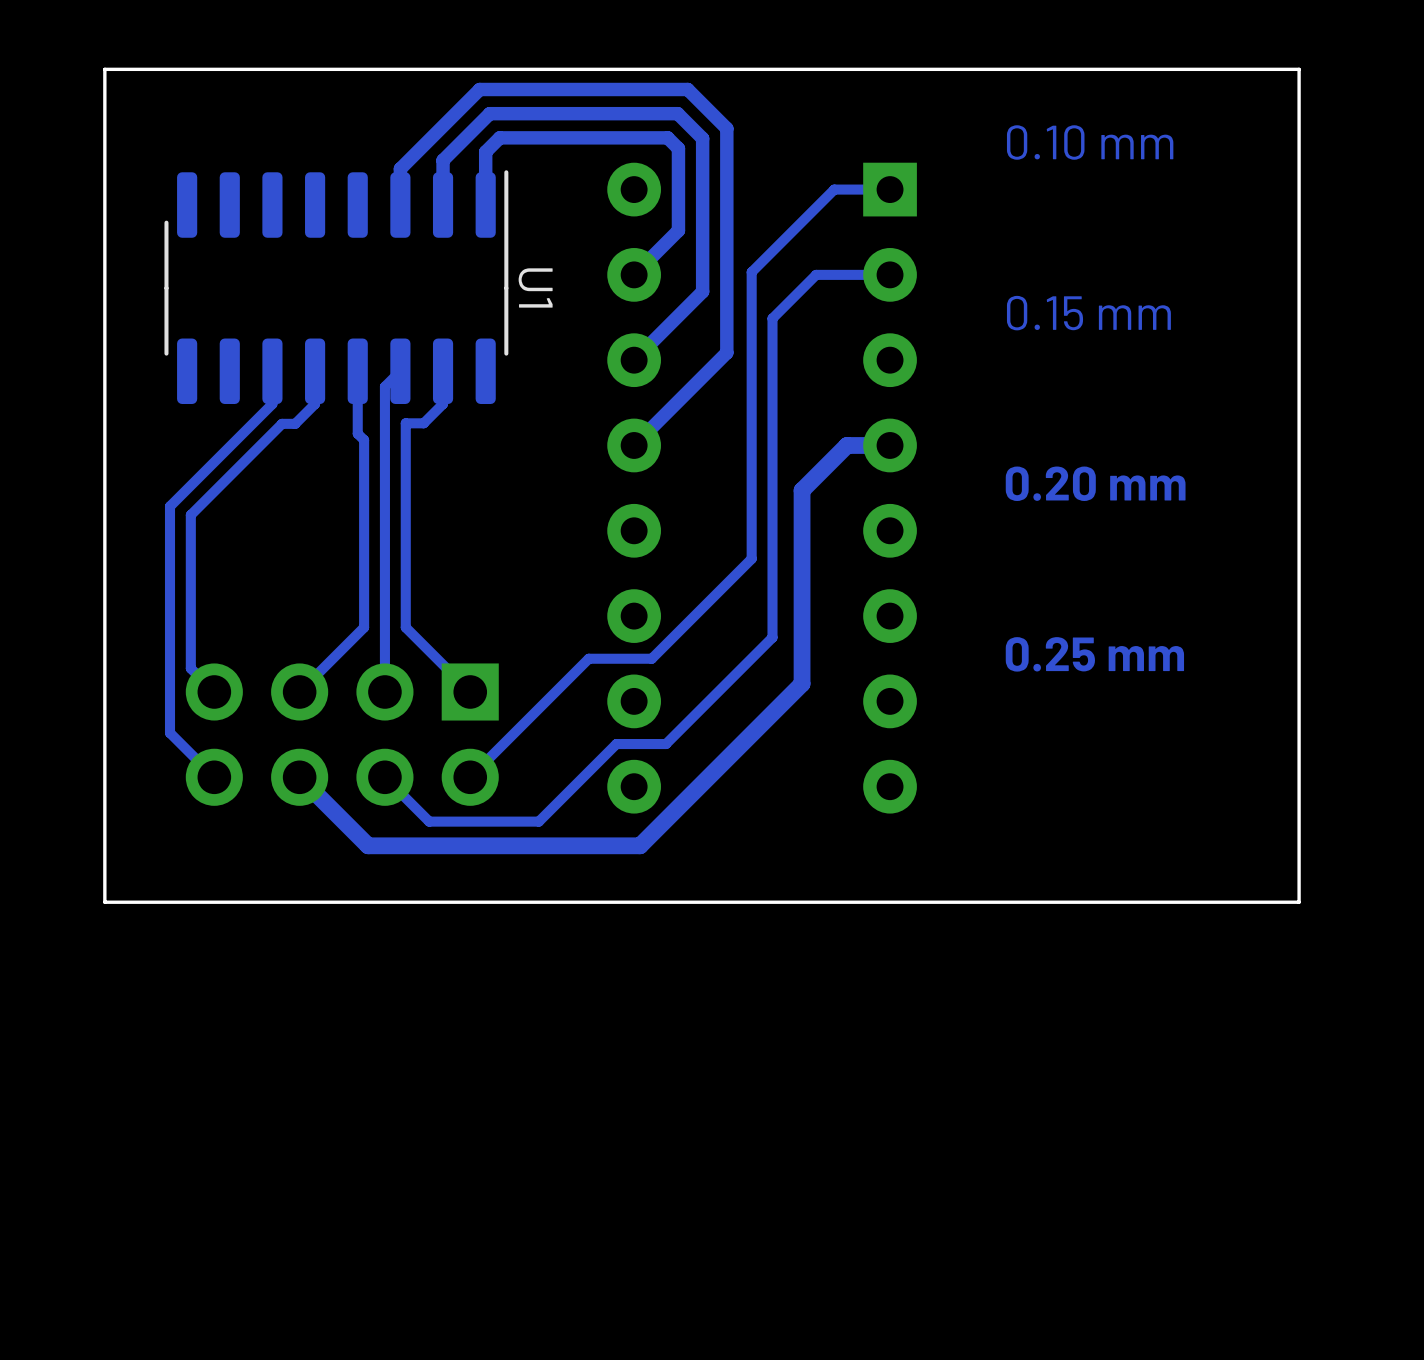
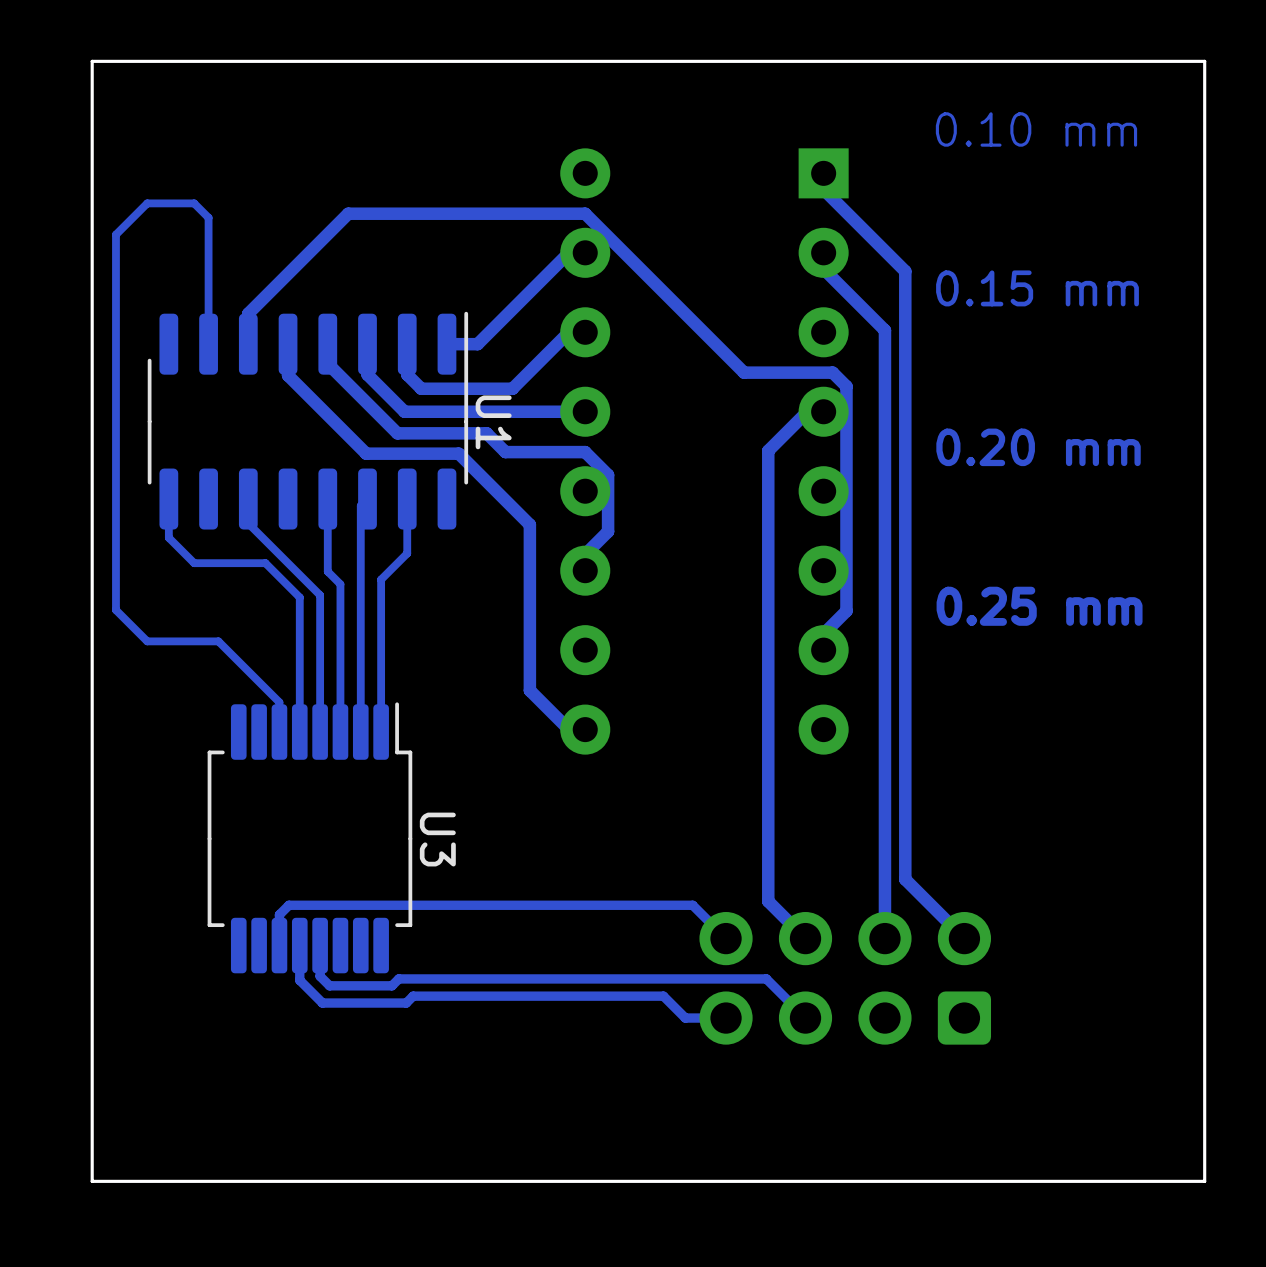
track: none -> (807, 173) (905, 271) (905, 879) (964, 938)
track: (890, 189) (834, 189) (751, 272) (751, 558) (651, 658) (588, 658) (470, 777) -> none
track: (443, 205) (443, 160) (489, 113) (677, 113) (702, 138) (702, 291) (634, 360) -> none
track: (485, 205) (485, 151) (499, 137) (667, 137) (678, 148) (678, 230) (634, 274) -> none
track: (400, 229) (400, 168) (479, 89) (687, 89) (726, 128) (726, 352) (634, 445) -> none
track: none -> (568, 252) (477, 344) (446, 344)
track: none -> (807, 252) (884, 330) (884, 938)
track: (890, 274) (816, 274) (772, 318) (772, 637) (666, 744) (616, 744) (538, 821) (429, 821) (384, 777) -> none
U1 position: (336, 287) -> (307, 420)
track: (400, 371) (384, 386) (384, 691) -> none
track: none -> (208, 344) (208, 217) (194, 203) (147, 203) (115, 234) (115, 610) (147, 641) (218, 641) (279, 702) (279, 732)
track: (272, 372) (272, 404) (170, 506) (170, 732) (214, 777) -> (248, 344) (248, 313) (348, 213) (585, 213) (744, 372) (832, 372) (846, 386) (846, 611) (807, 650)
track: none -> (367, 344) (367, 374) (404, 411) (568, 411)
track: (357, 393) (357, 433) (364, 440) (364, 627) (299, 691) -> (327, 363) (397, 433) (486, 433) (505, 452) (585, 452) (608, 475) (608, 531) (568, 570)
track: (315, 404) (295, 423) (282, 423) (190, 515) (190, 668) (214, 691) -> (288, 373) (288, 375) (366, 453) (458, 453) (529, 524) (529, 690) (568, 729)
track: (443, 404) (423, 423) (405, 423) (405, 627) (470, 691) -> (407, 373) (421, 388) (512, 388) (568, 332)
track: none -> (807, 411) (768, 450) (768, 901) (805, 938)
track: (890, 445) (847, 445) (802, 490) (802, 683) (640, 845) (368, 845) (299, 777) -> none
track: none -> (168, 499) (168, 537) (194, 563) (265, 563) (299, 597) (299, 732)
track: none -> (248, 499) (248, 523) (320, 595) (320, 732)
track: none -> (327, 499) (327, 571) (340, 584) (340, 732)
track: none -> (367, 499) (360, 505) (360, 732)
track: none -> (407, 499) (407, 553) (381, 579) (381, 732)
part: (342, 734) -> none
U3: none -> (309, 837)
board edge: (1299, 902) (104, 902) -> (1204, 837) (1204, 1181) (92, 1181) (92, 837)
track: none -> (726, 938) (692, 905) (288, 905) (279, 914) (279, 945)
track: none -> (299, 945) (299, 980) (322, 1003) (406, 1003) (413, 996) (663, 996) (685, 1018) (726, 1018)
track: none -> (320, 945) (320, 976) (329, 985) (391, 985) (398, 978) (766, 978) (805, 1018)
part: none -> (845, 978)

